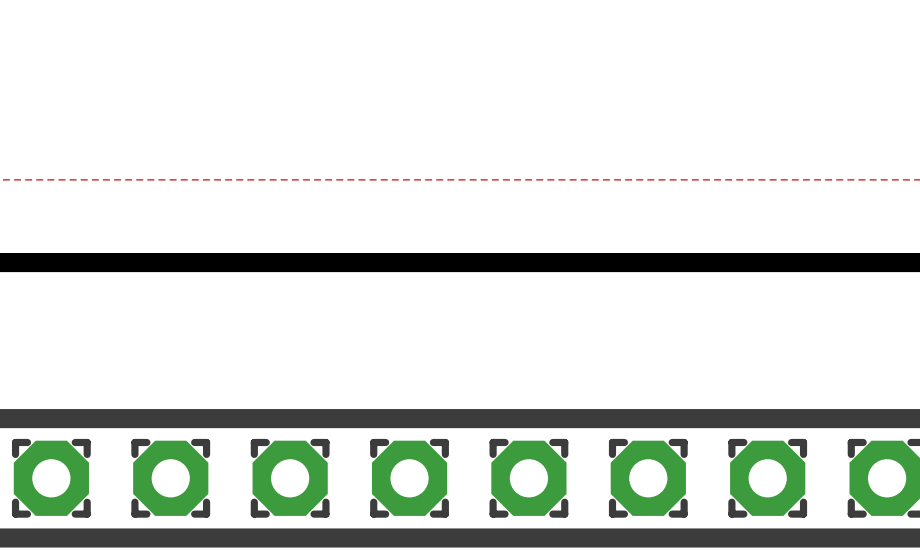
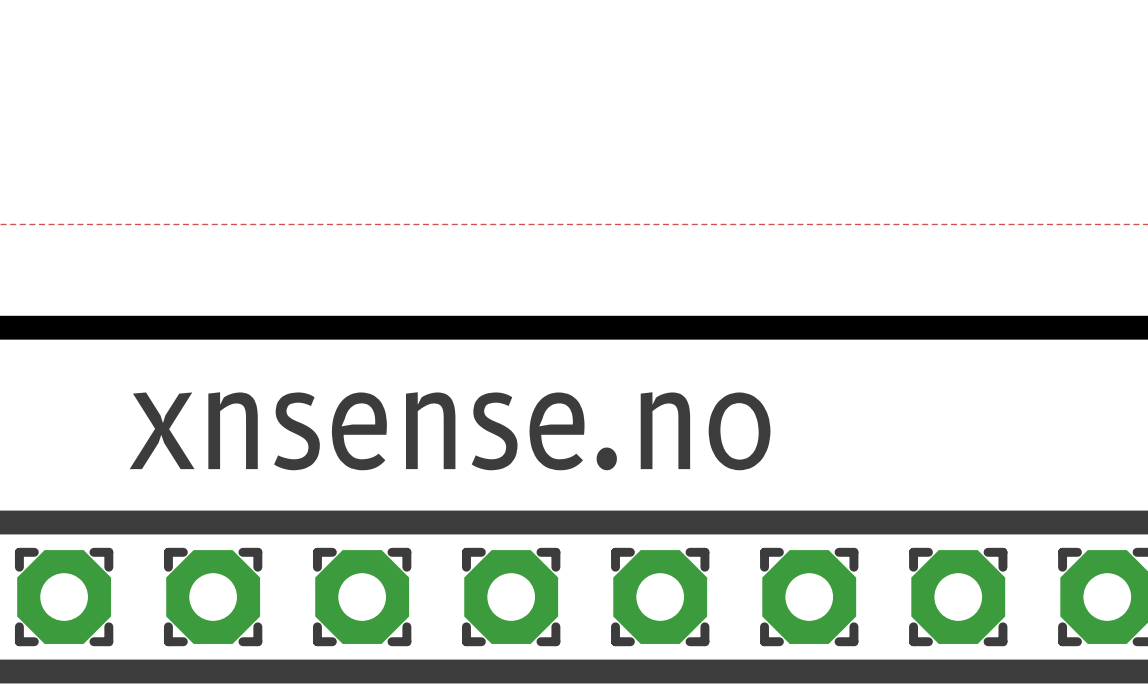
text: none -> xnsense.no (450, 431)

